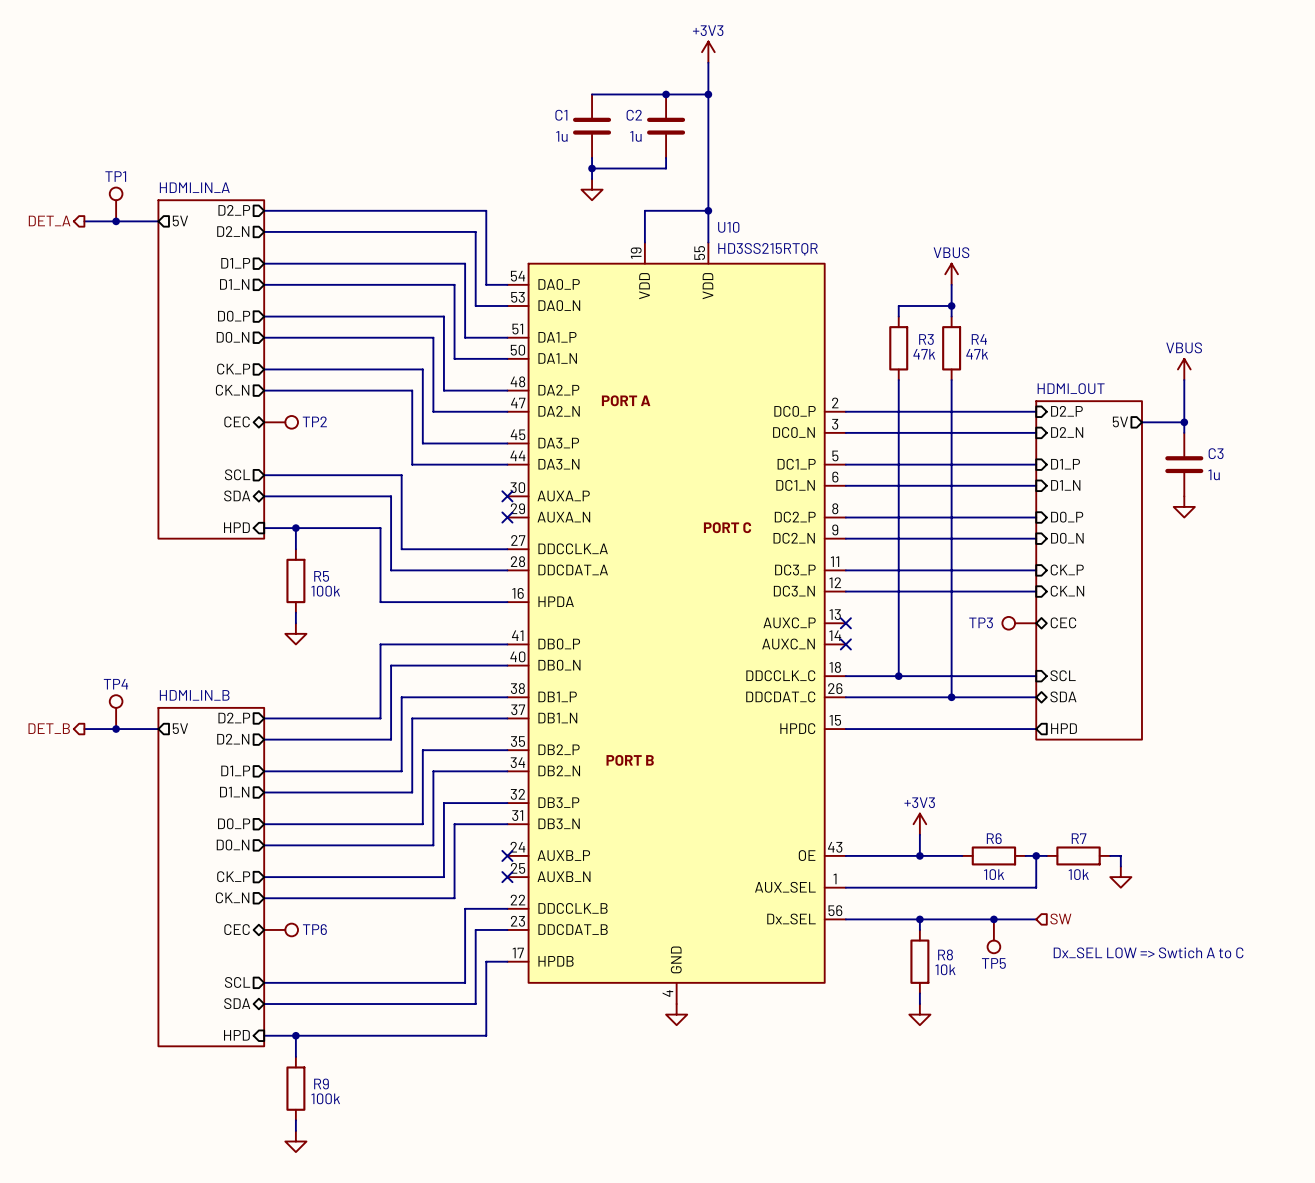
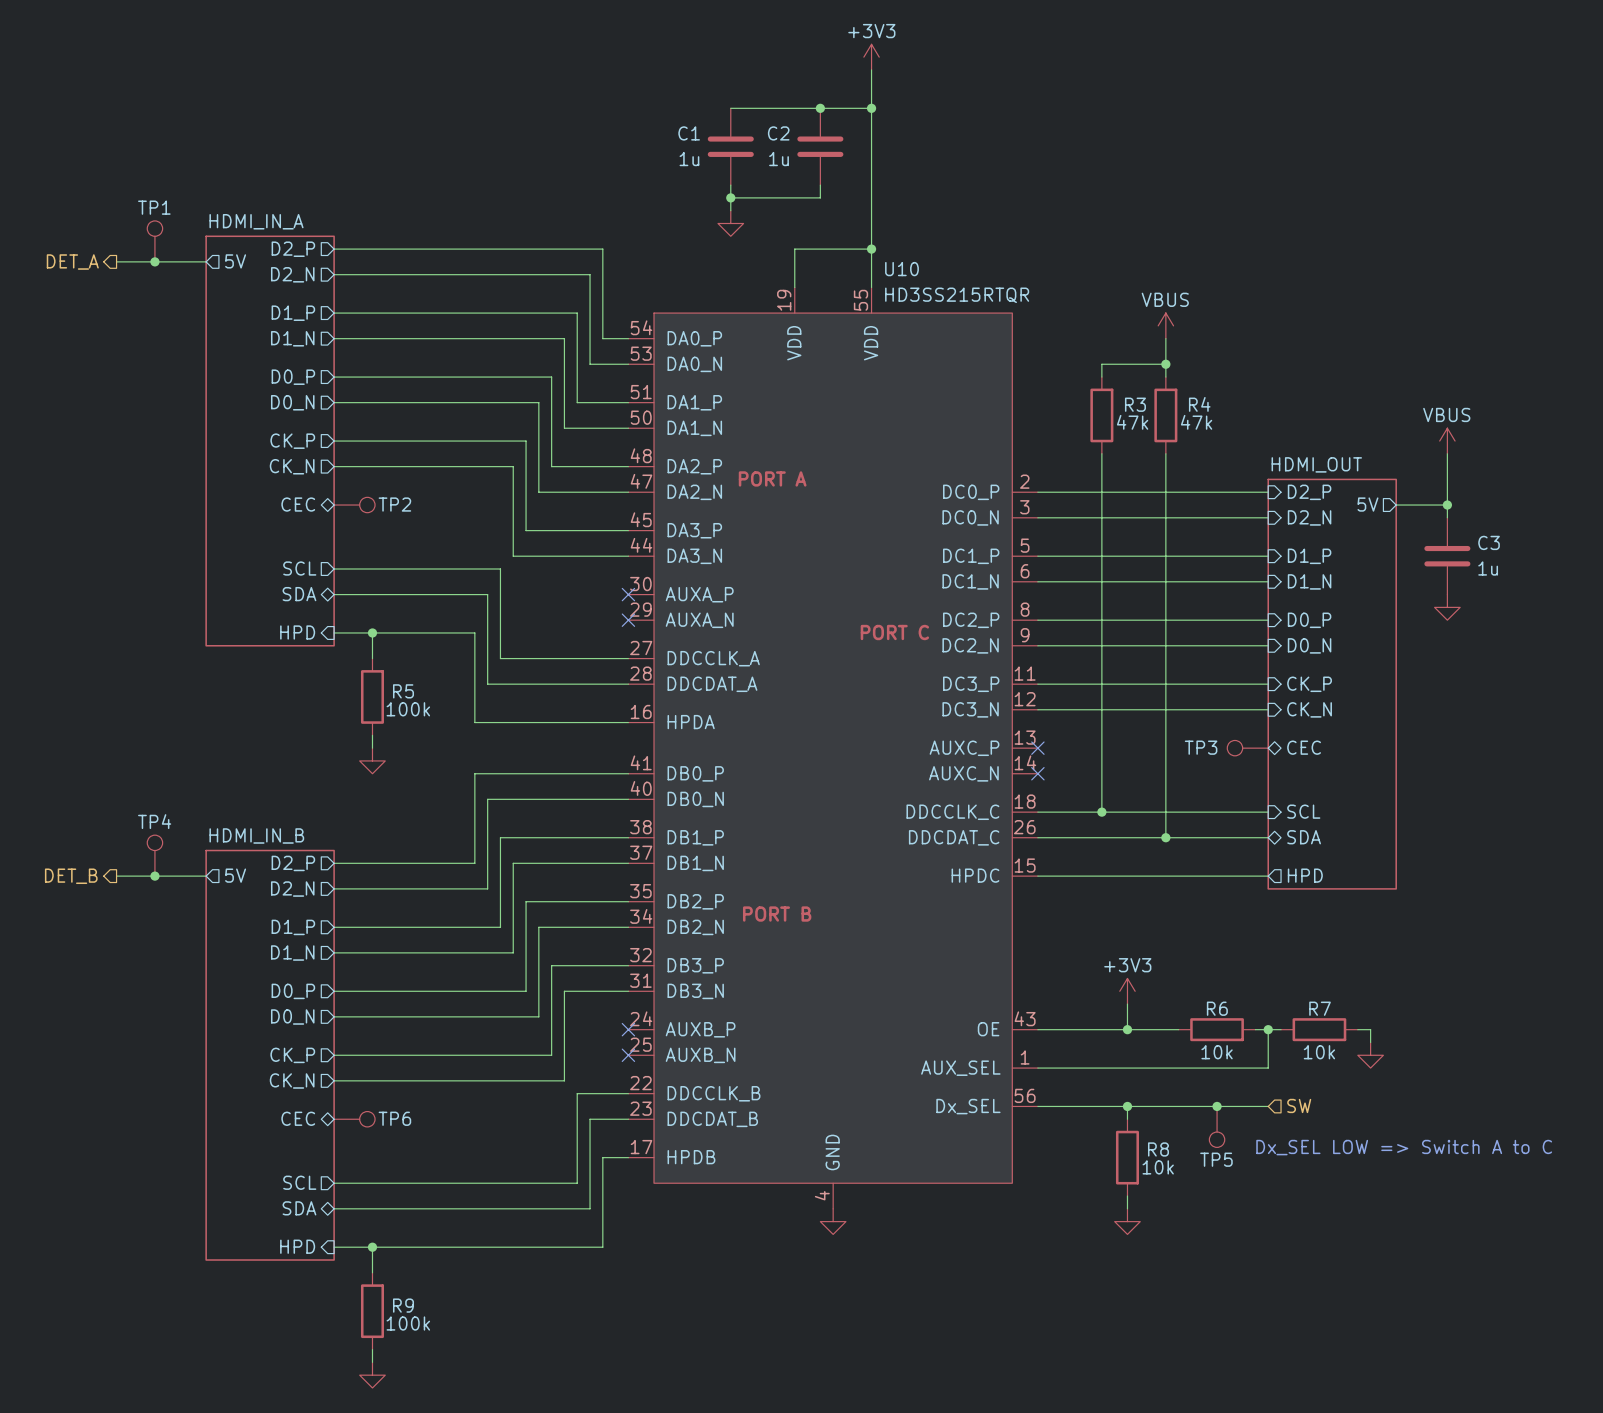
text: Dx_SEL LOW => Swtich A to C (1148, 952) -> Dx_SEL LOW => Switch A to C (1404, 1147)

